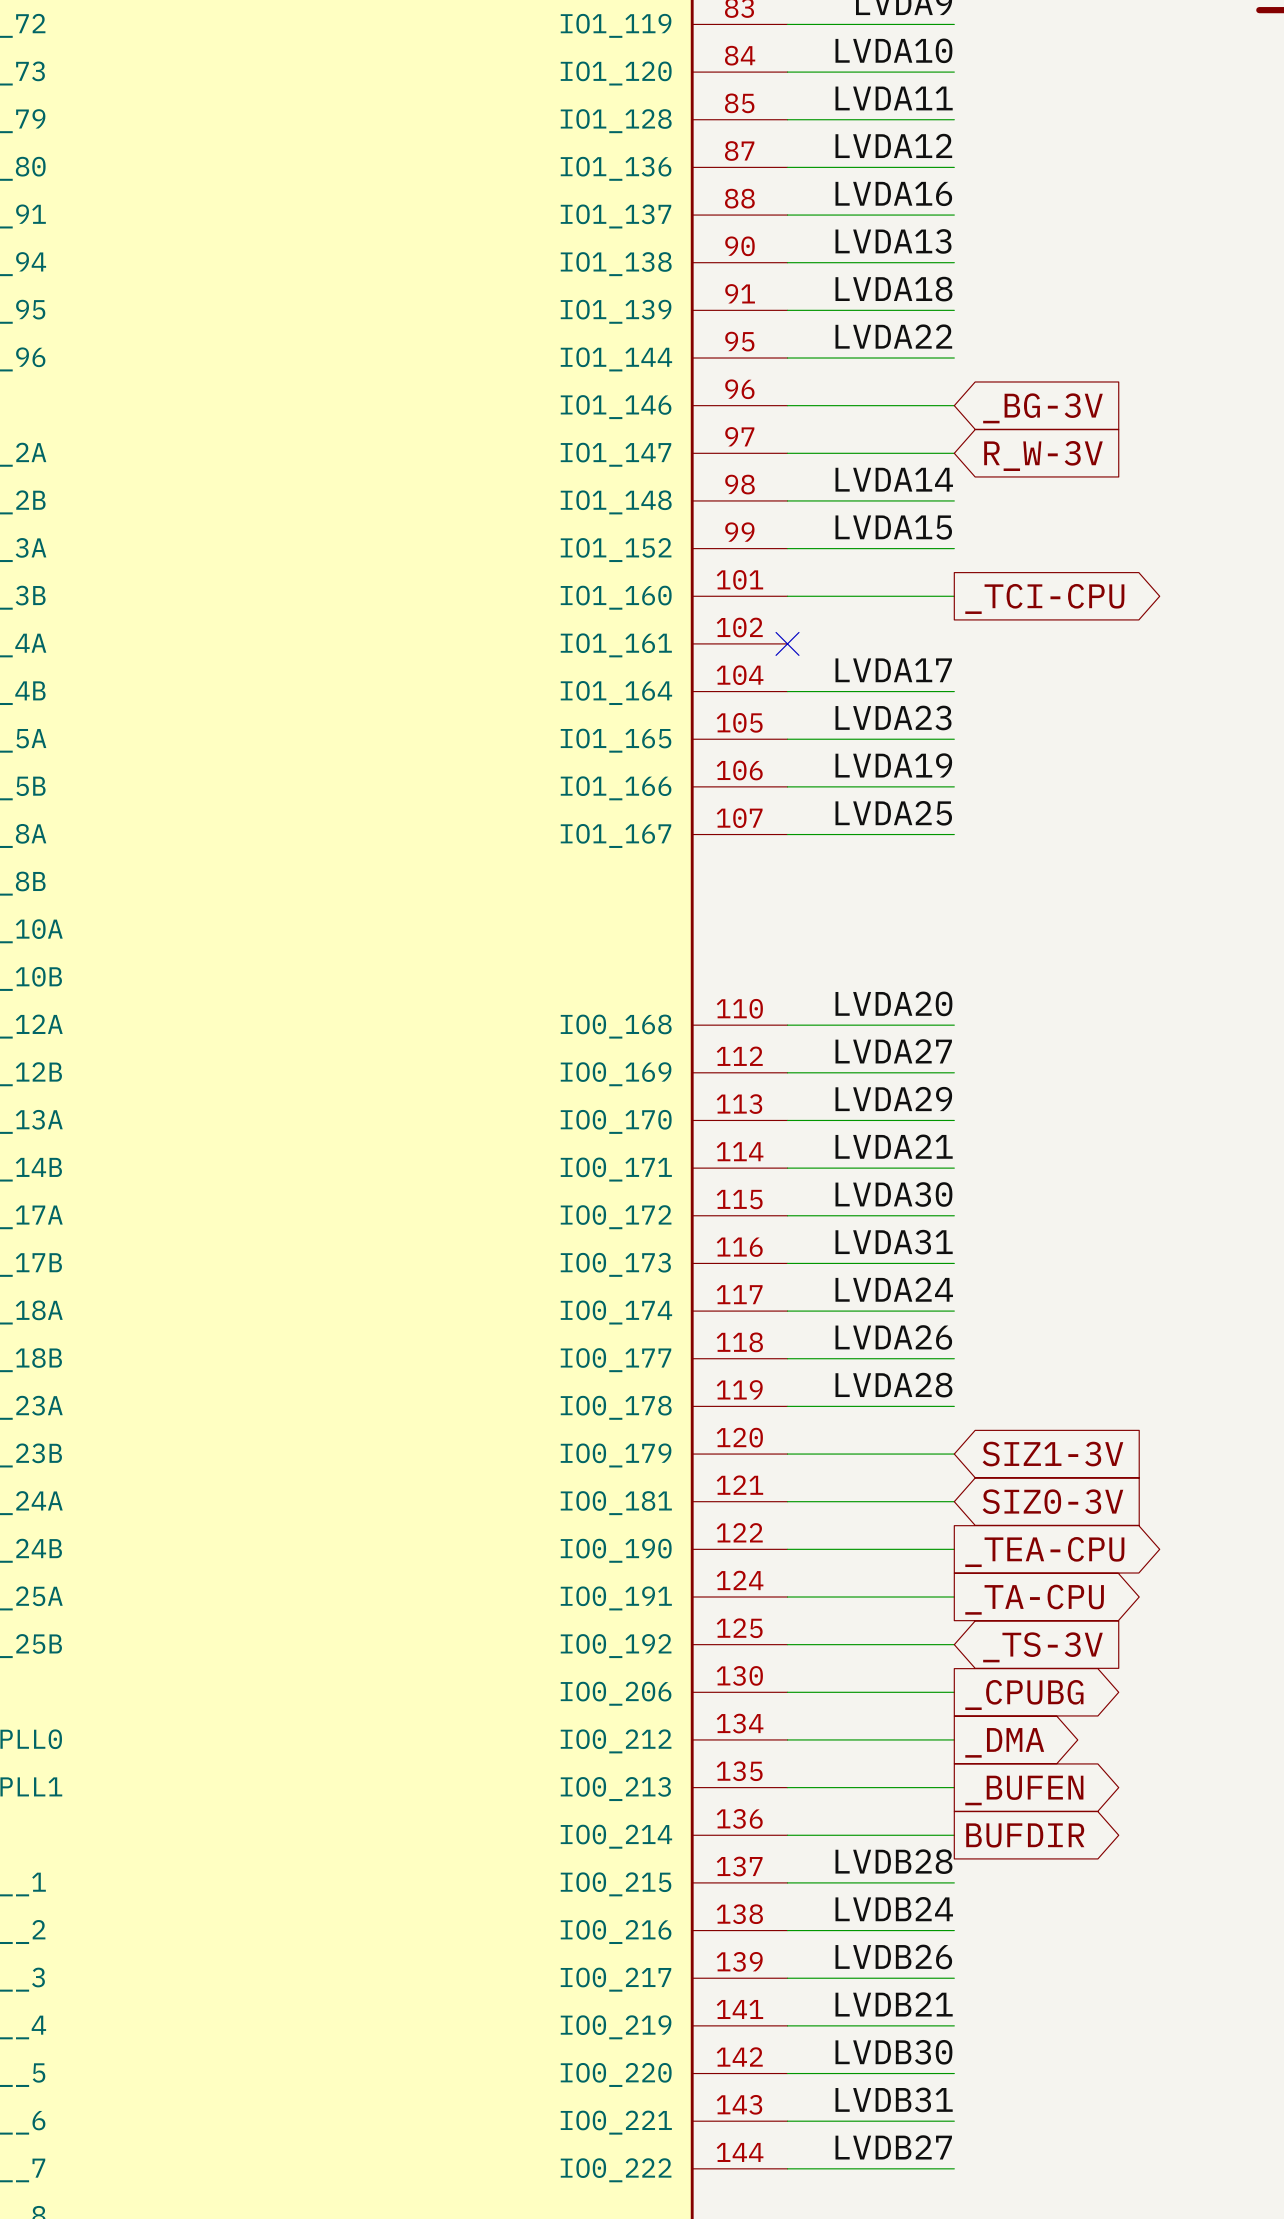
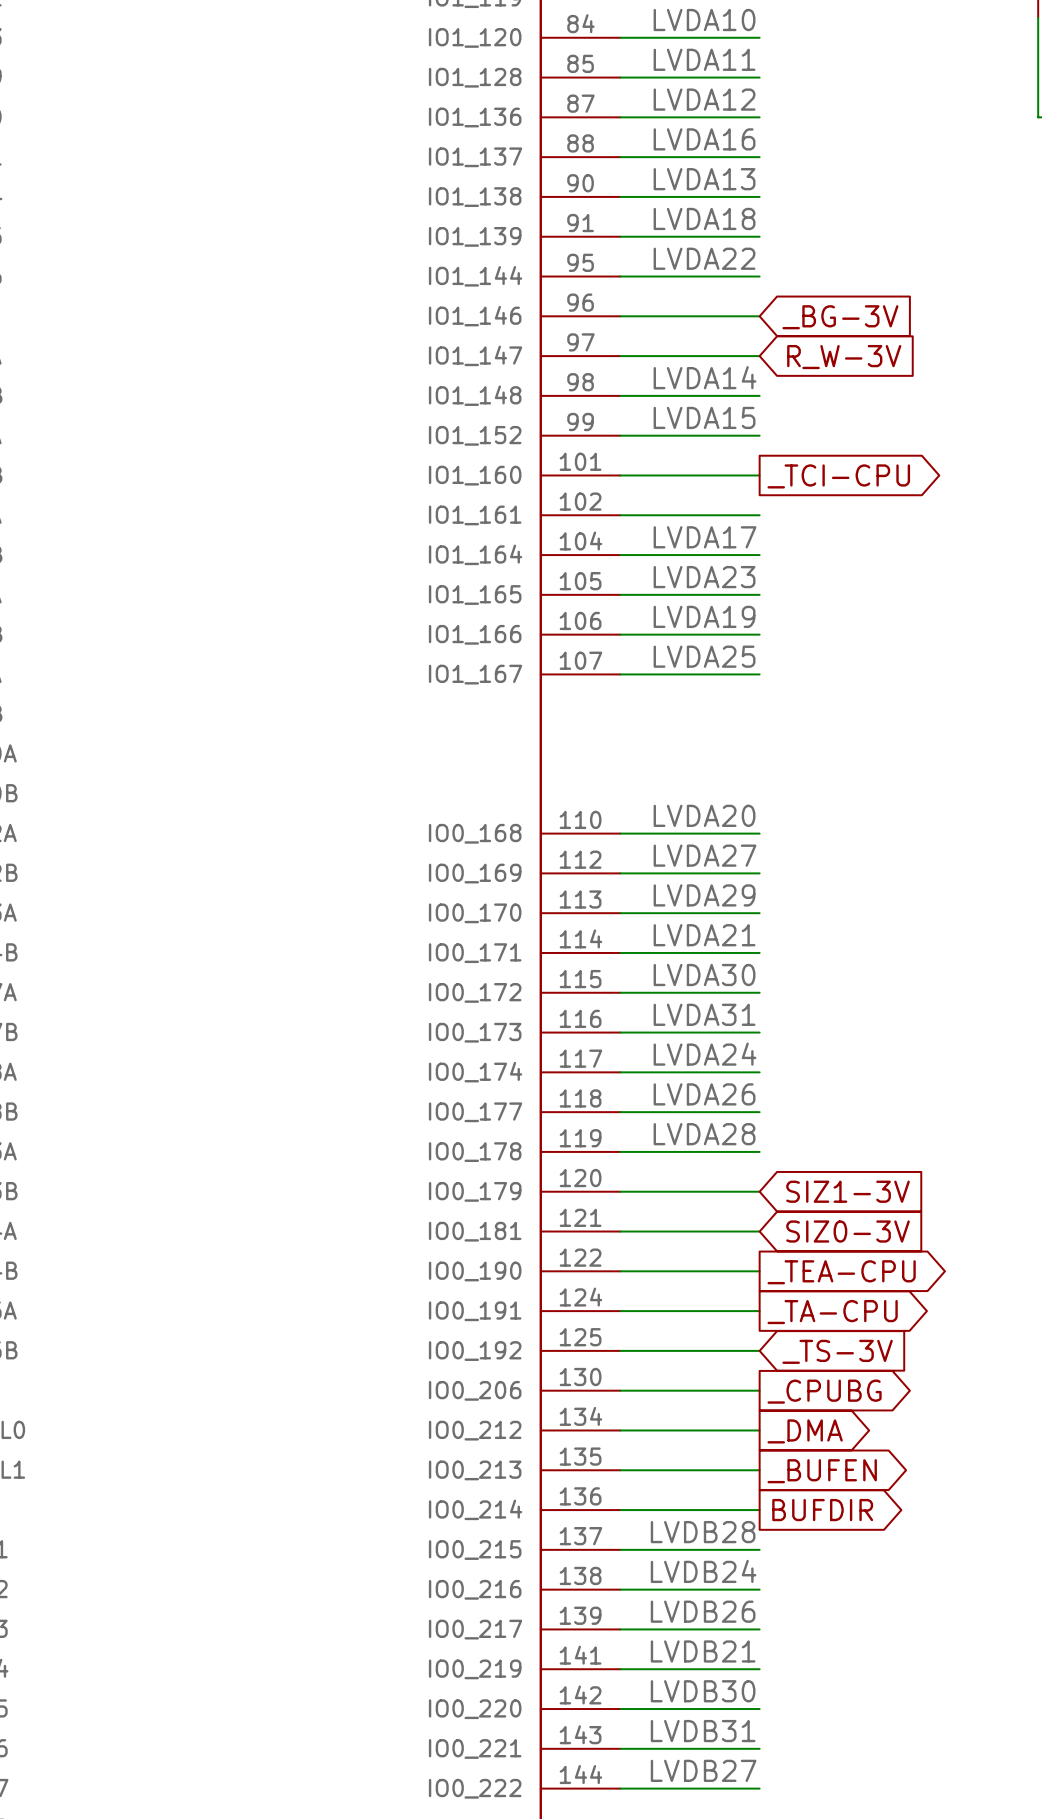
wire: none -> (620, 515) (759, 515)
no-connect mark: (787, 643) -> none

